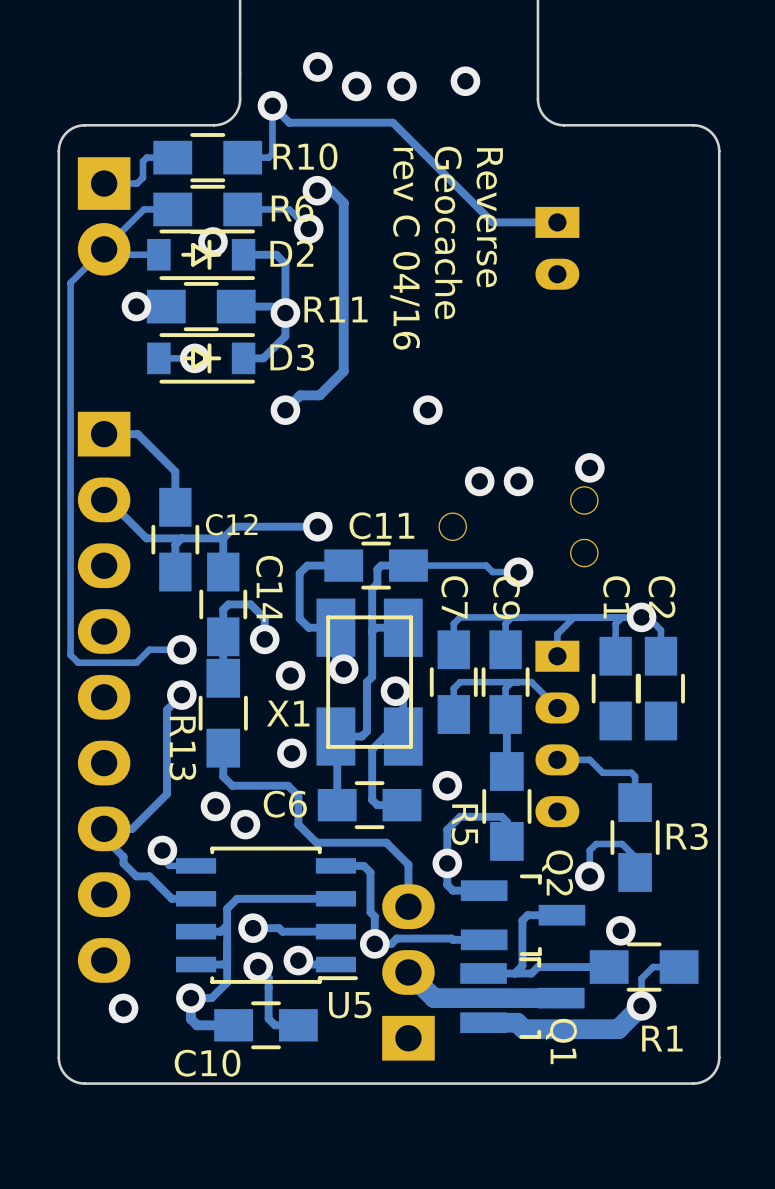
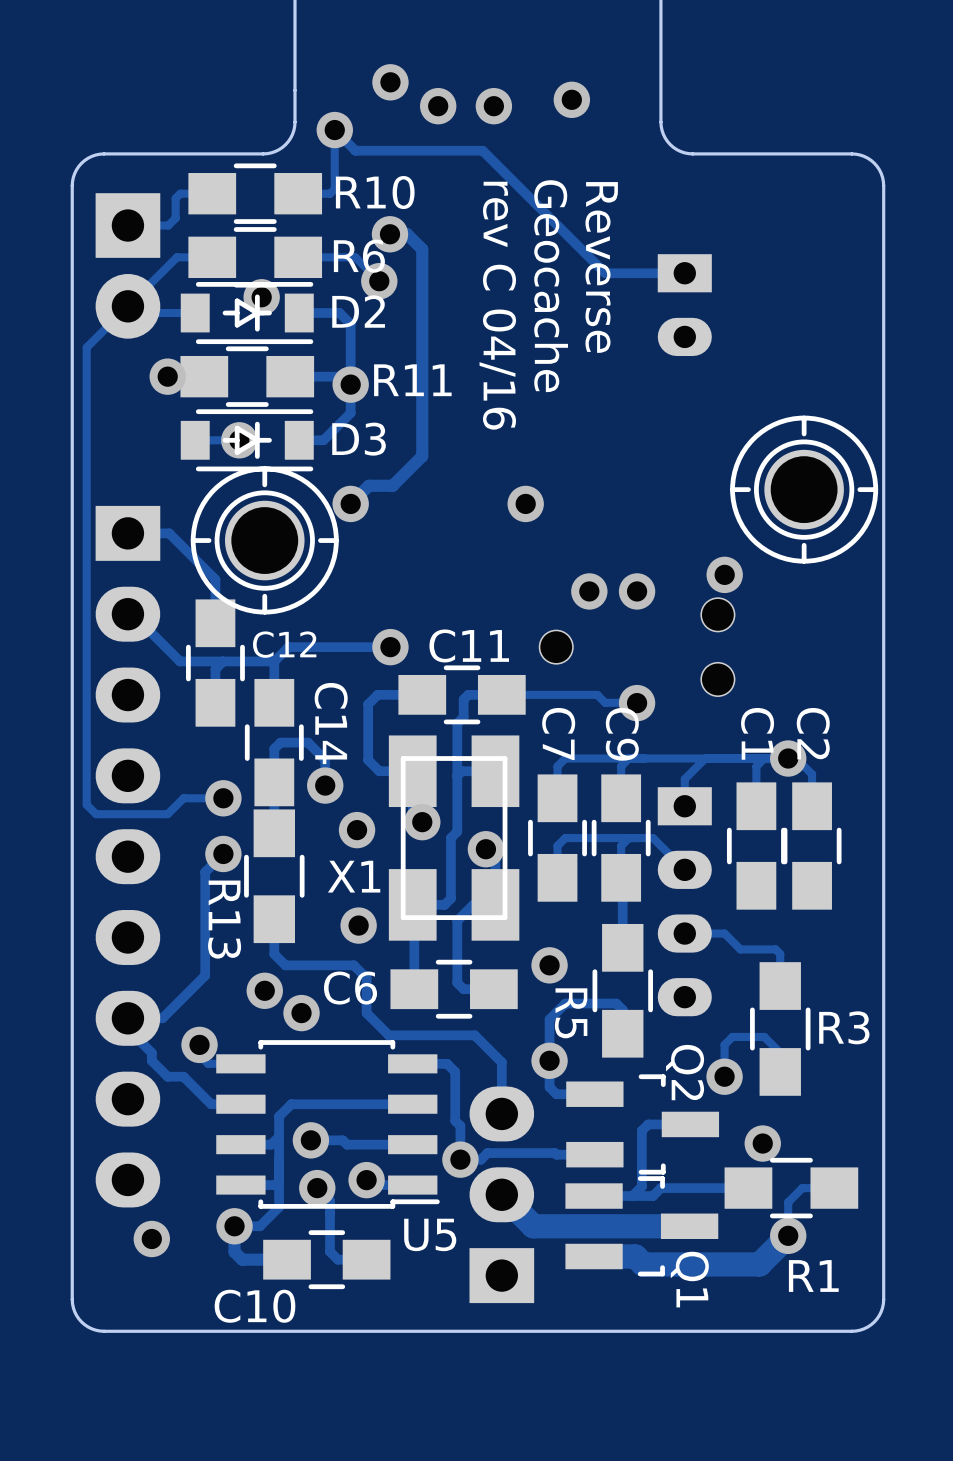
part: none -> (804, 489)
part: none -> (264, 540)

